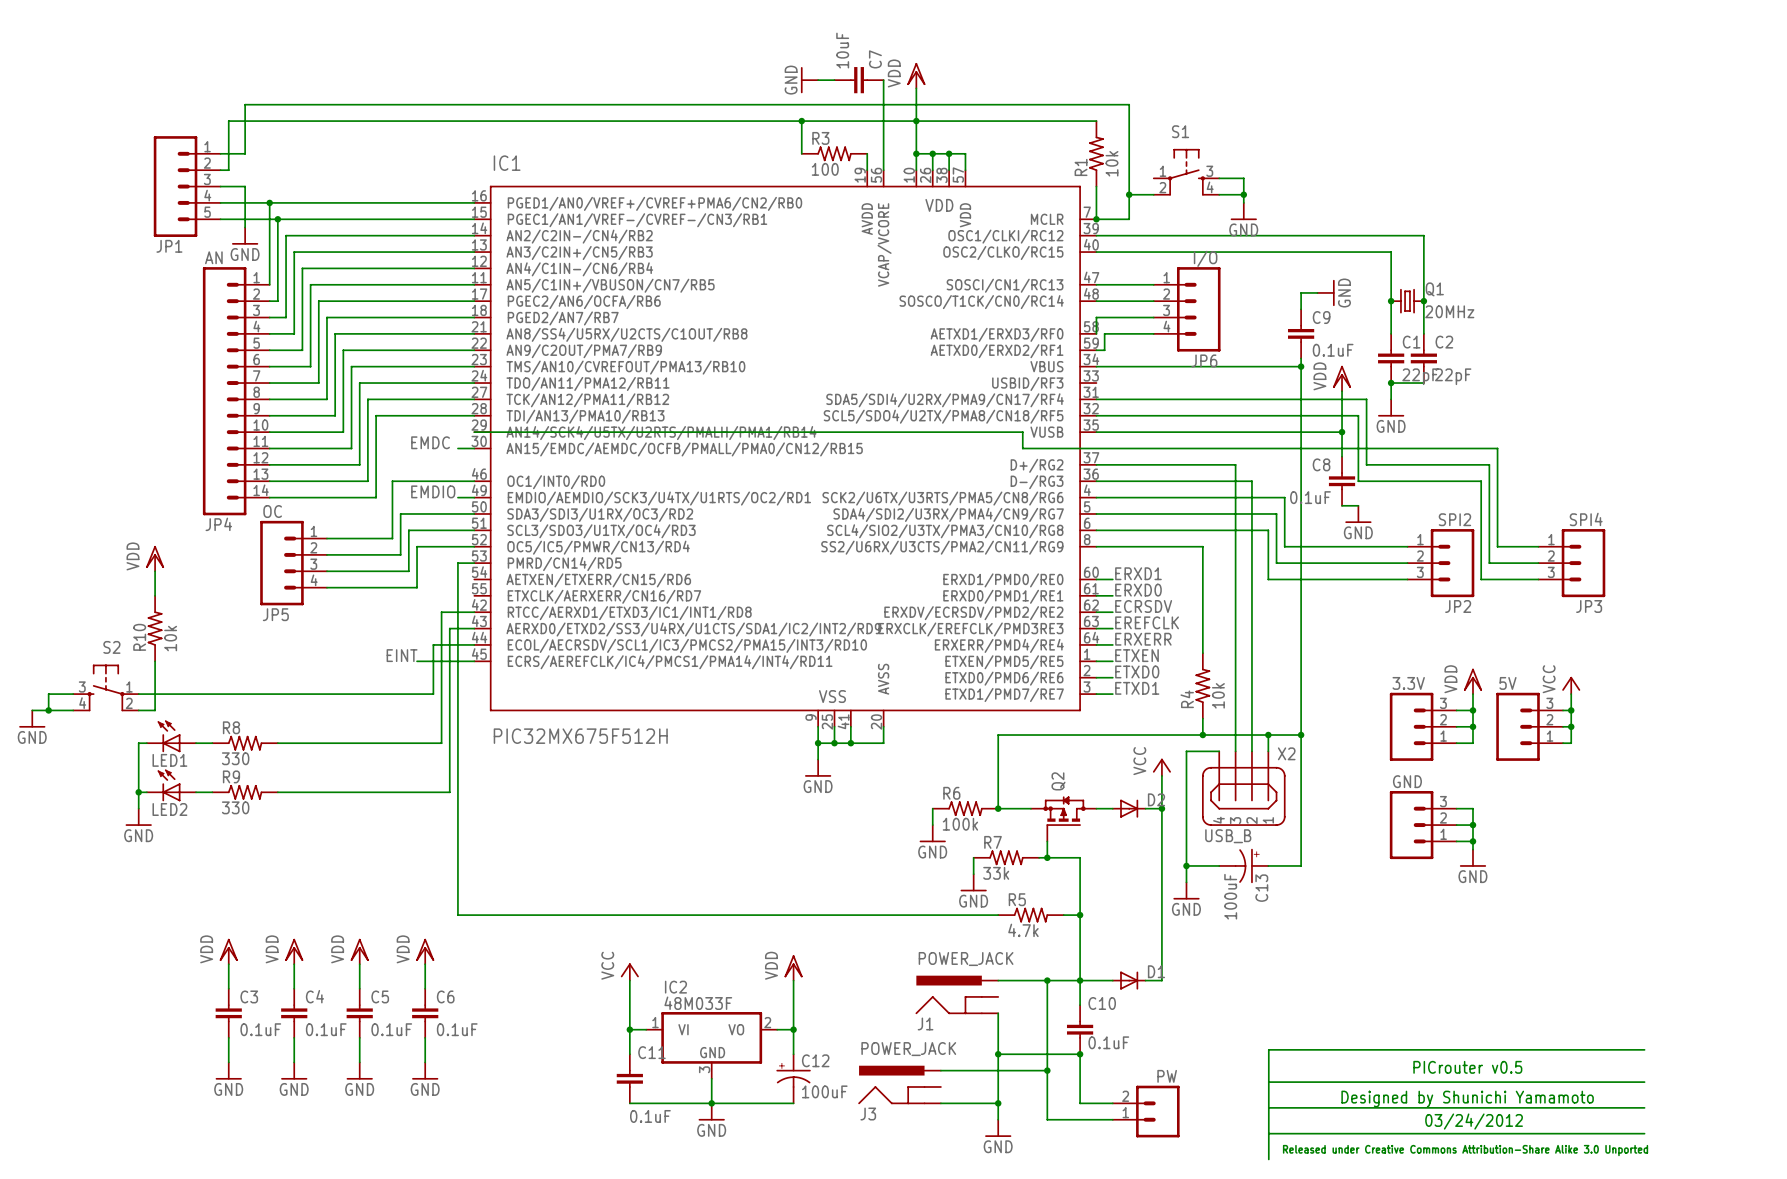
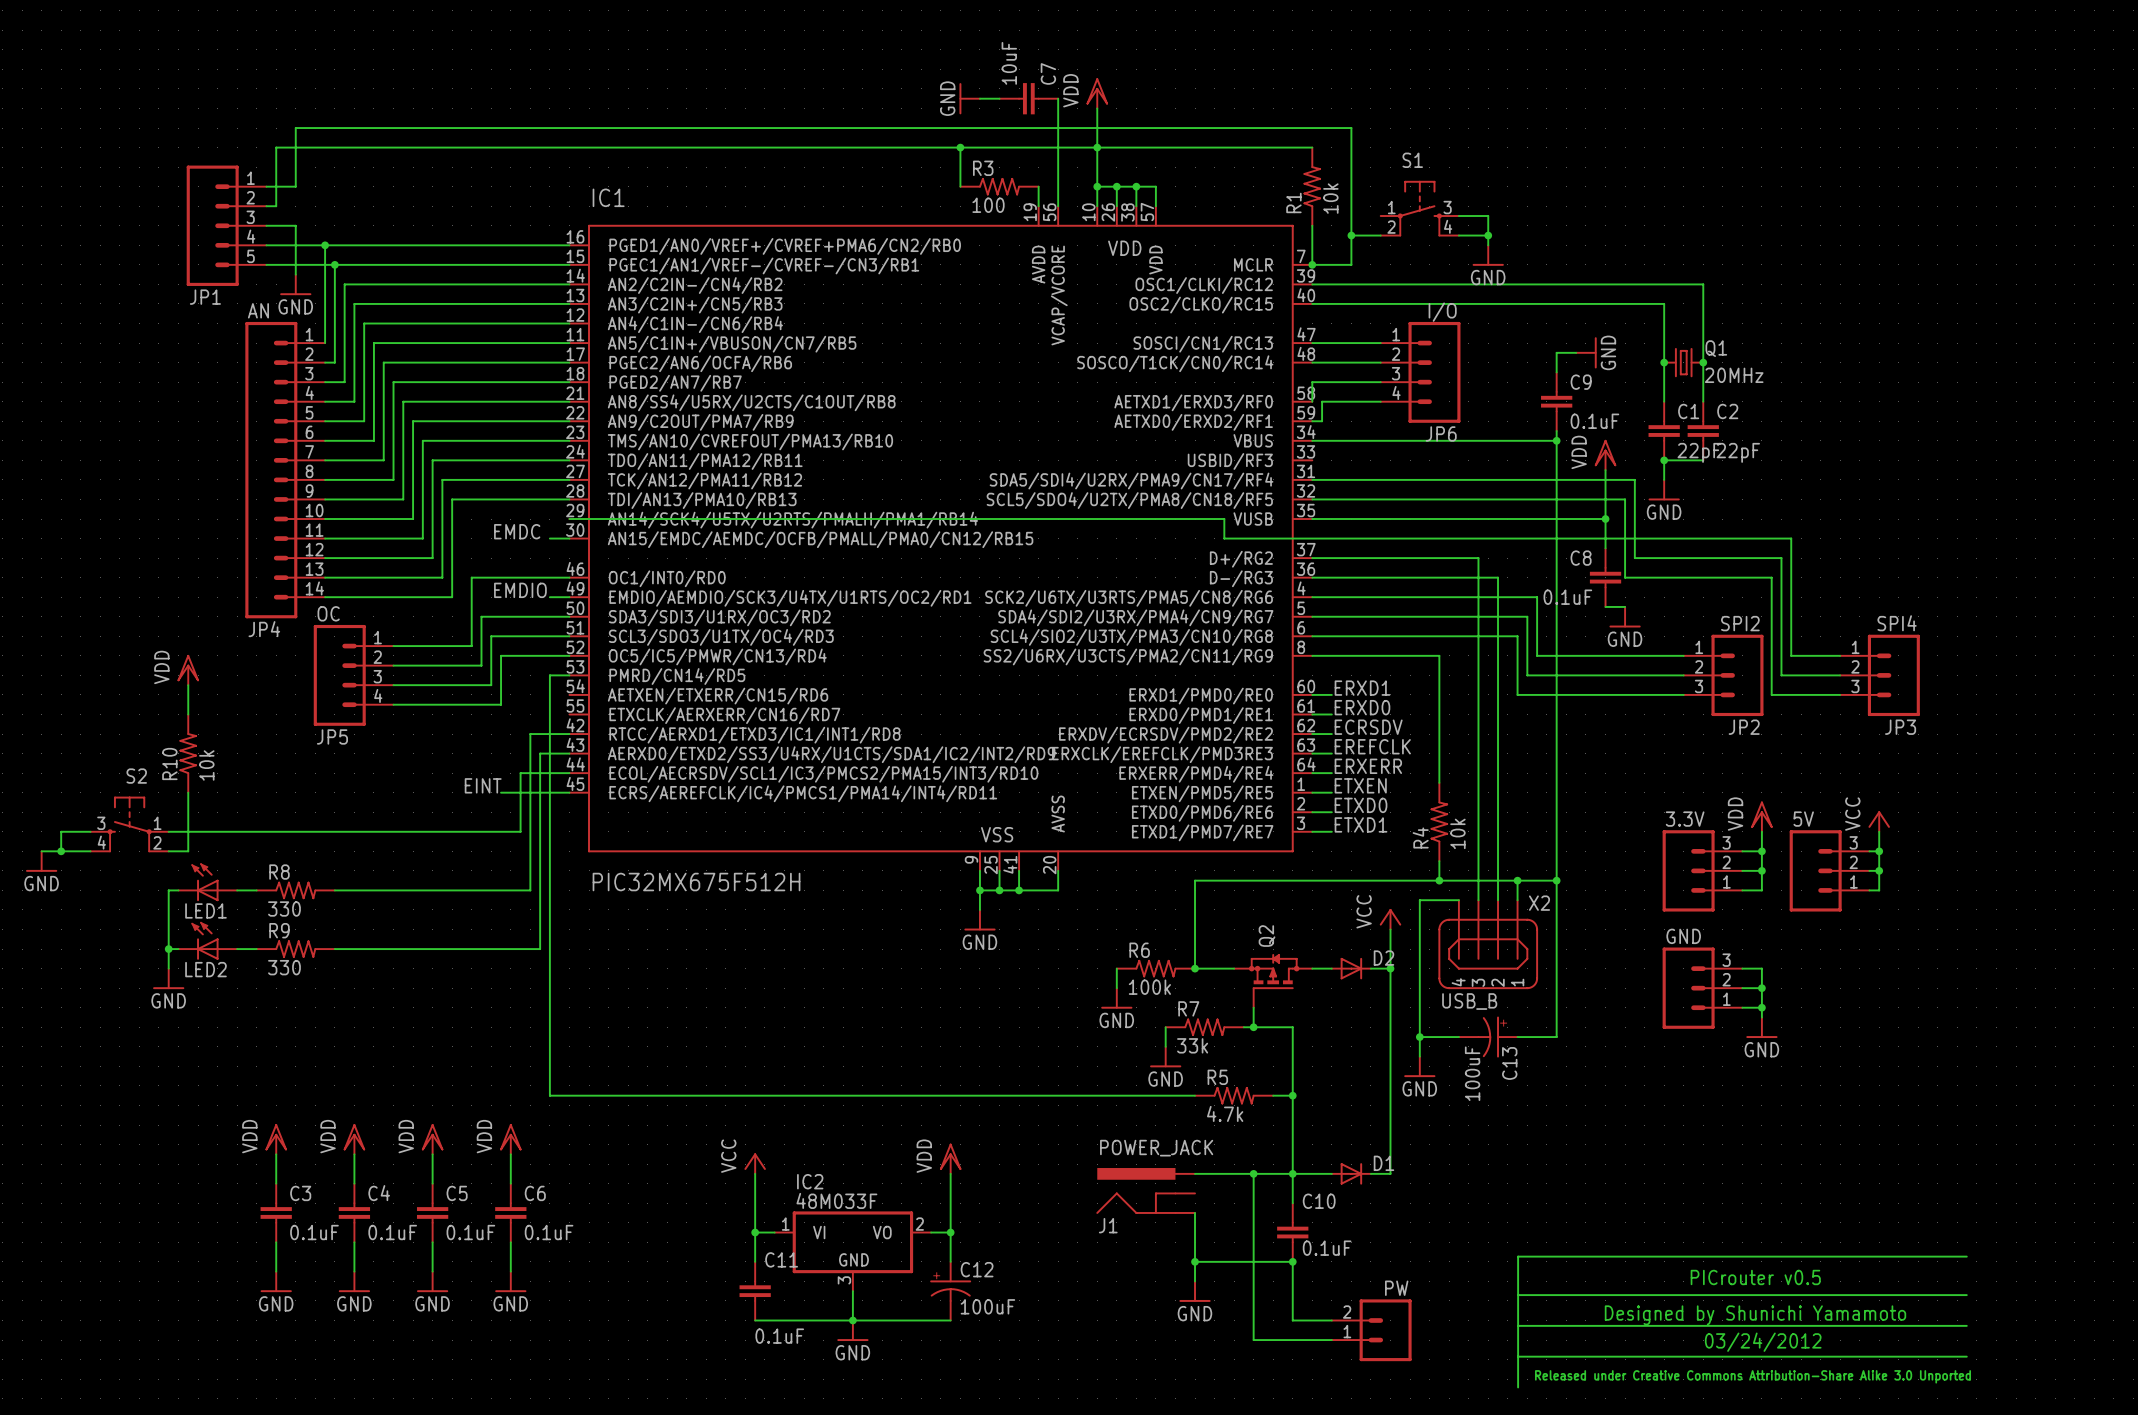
wire: (940, 1070) (1047, 1070) -> none
wire: (998, 1070) (998, 1119) -> none
junction: (1047, 1070) -> none
J3: POWER_JACK (899, 1084) -> none
wire: (940, 1103) (998, 1103) -> none
junction: (998, 1103) -> none
power symbol position: GND (998, 1128) -> GND (1195, 1291)

